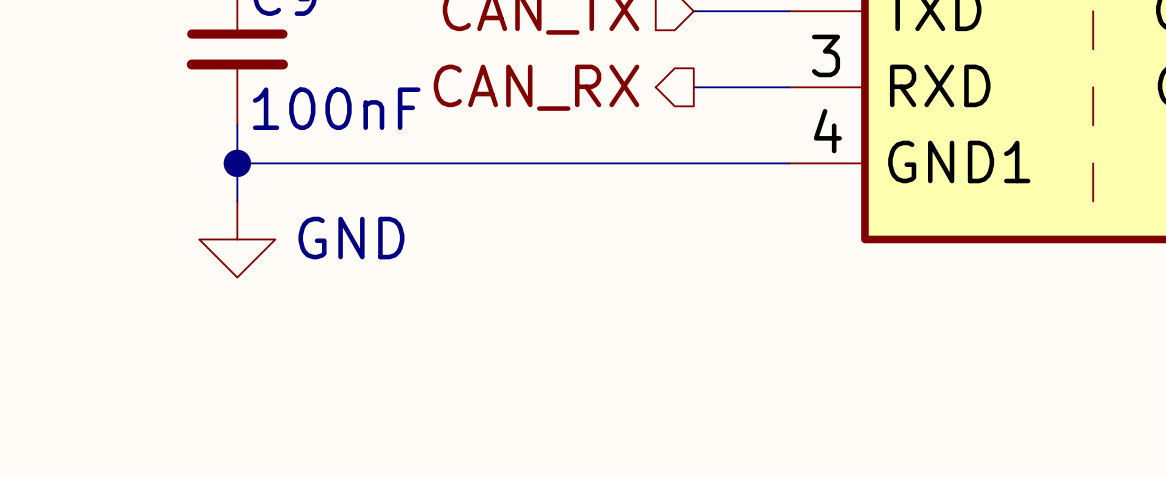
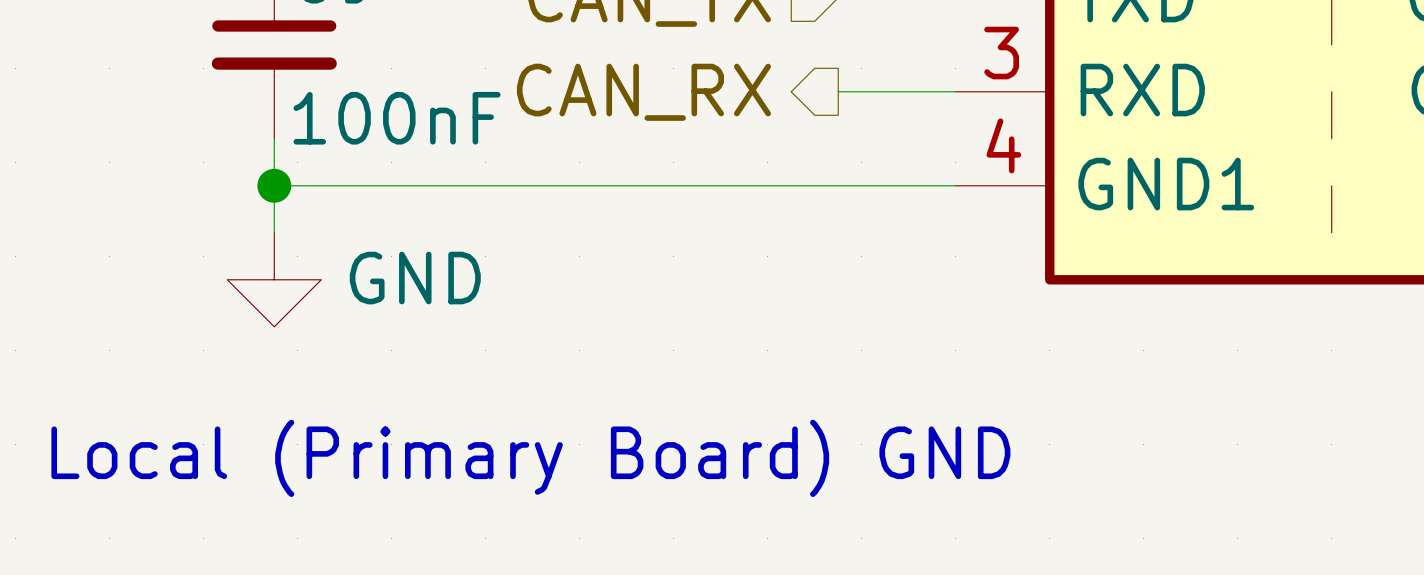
text: none -> Local (Primary Board) GND (530, 458)

